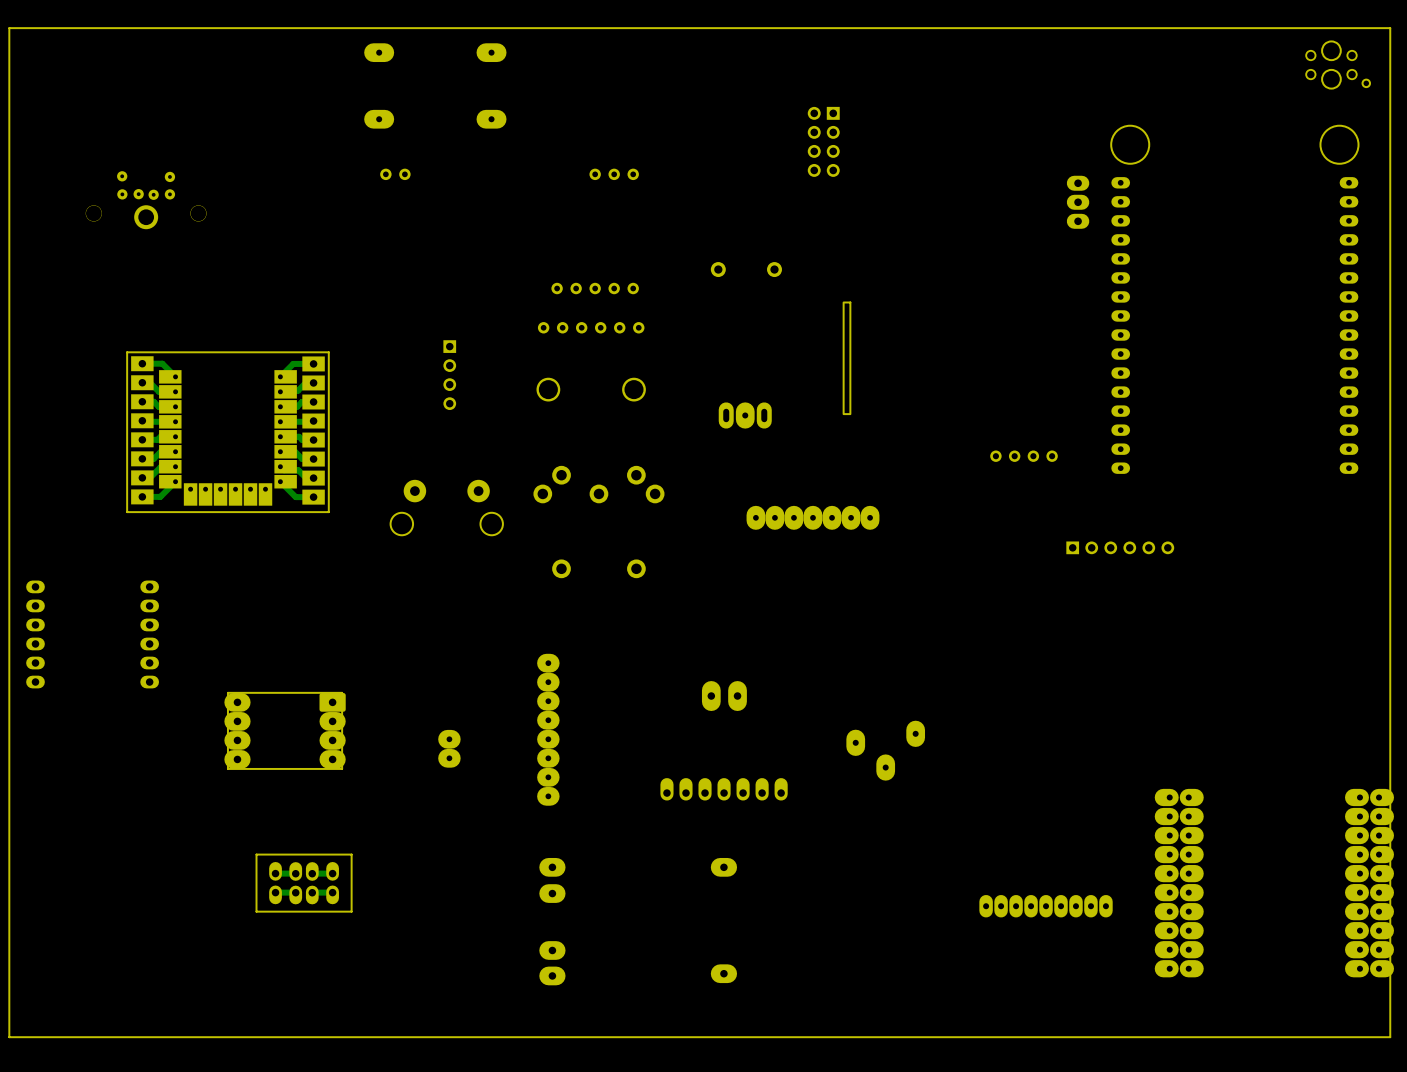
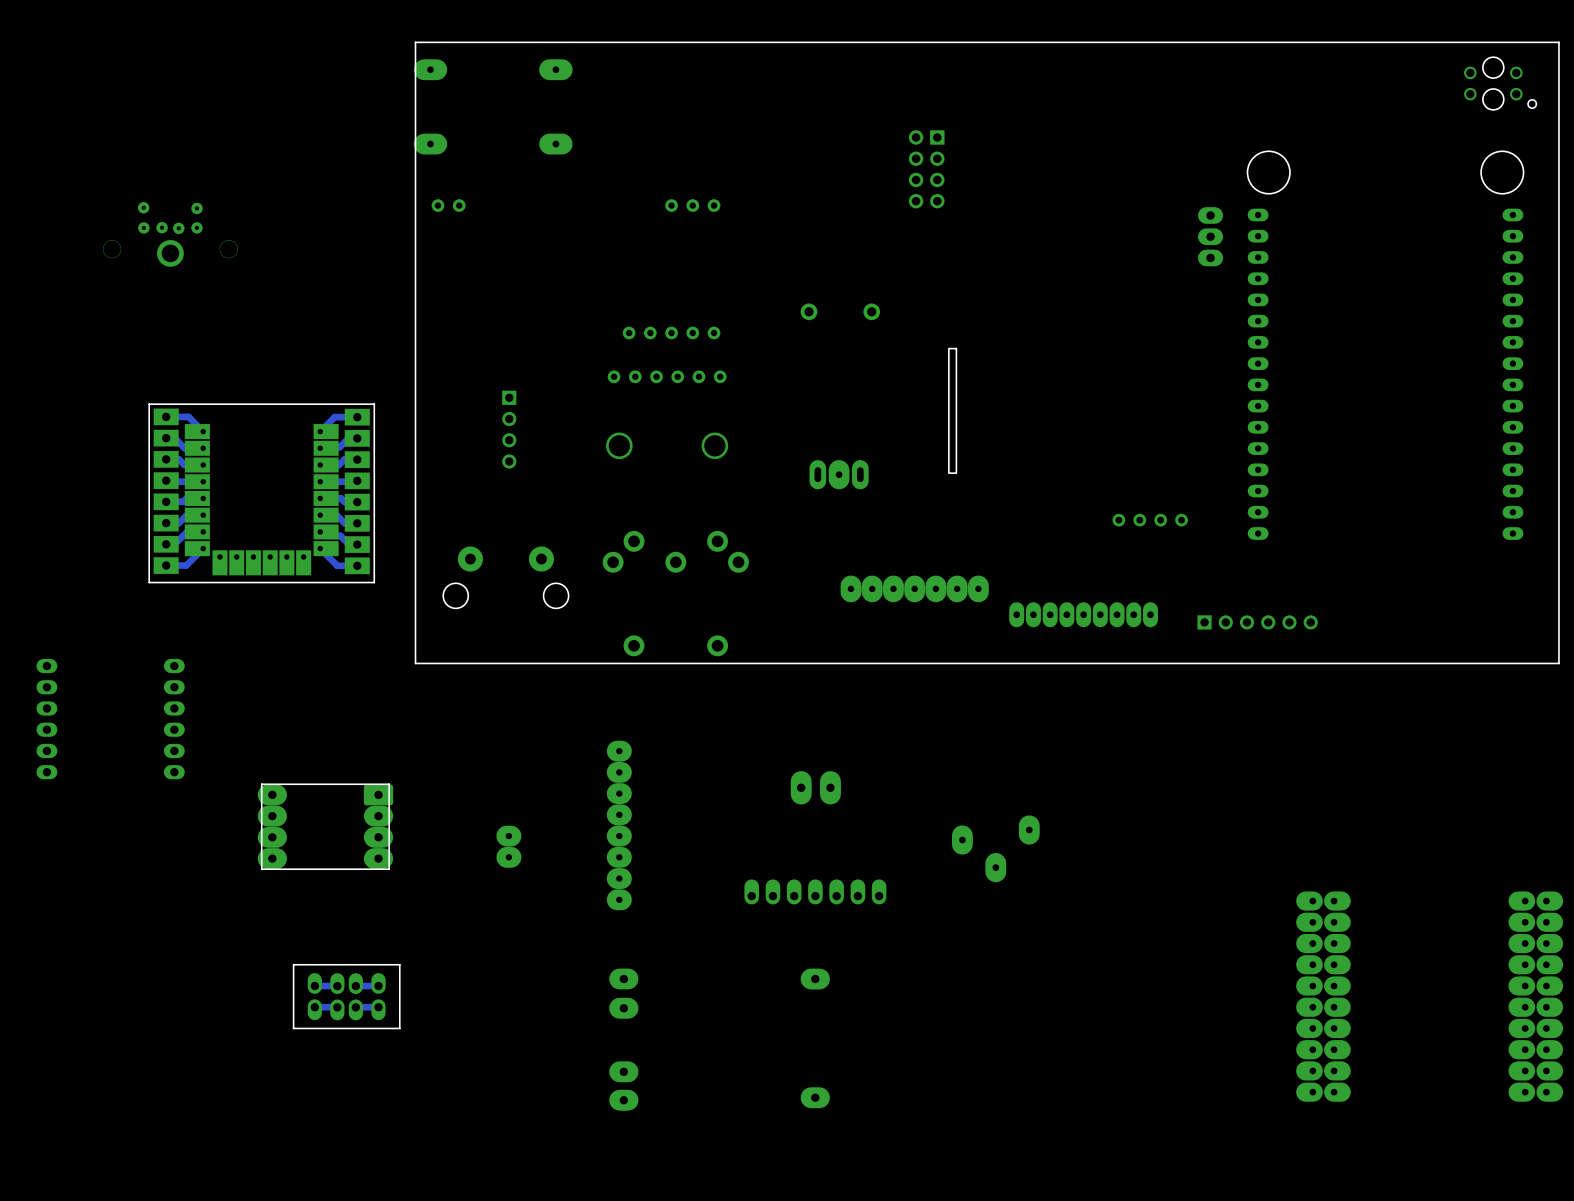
board edge: (365, 28) (9, 28) (9, 1037) (1390, 1037) (1390, 584) -> (415, 42) (415, 663) (1558, 663)
part: none -> (1083, 614)
part: (1046, 906) -> none

